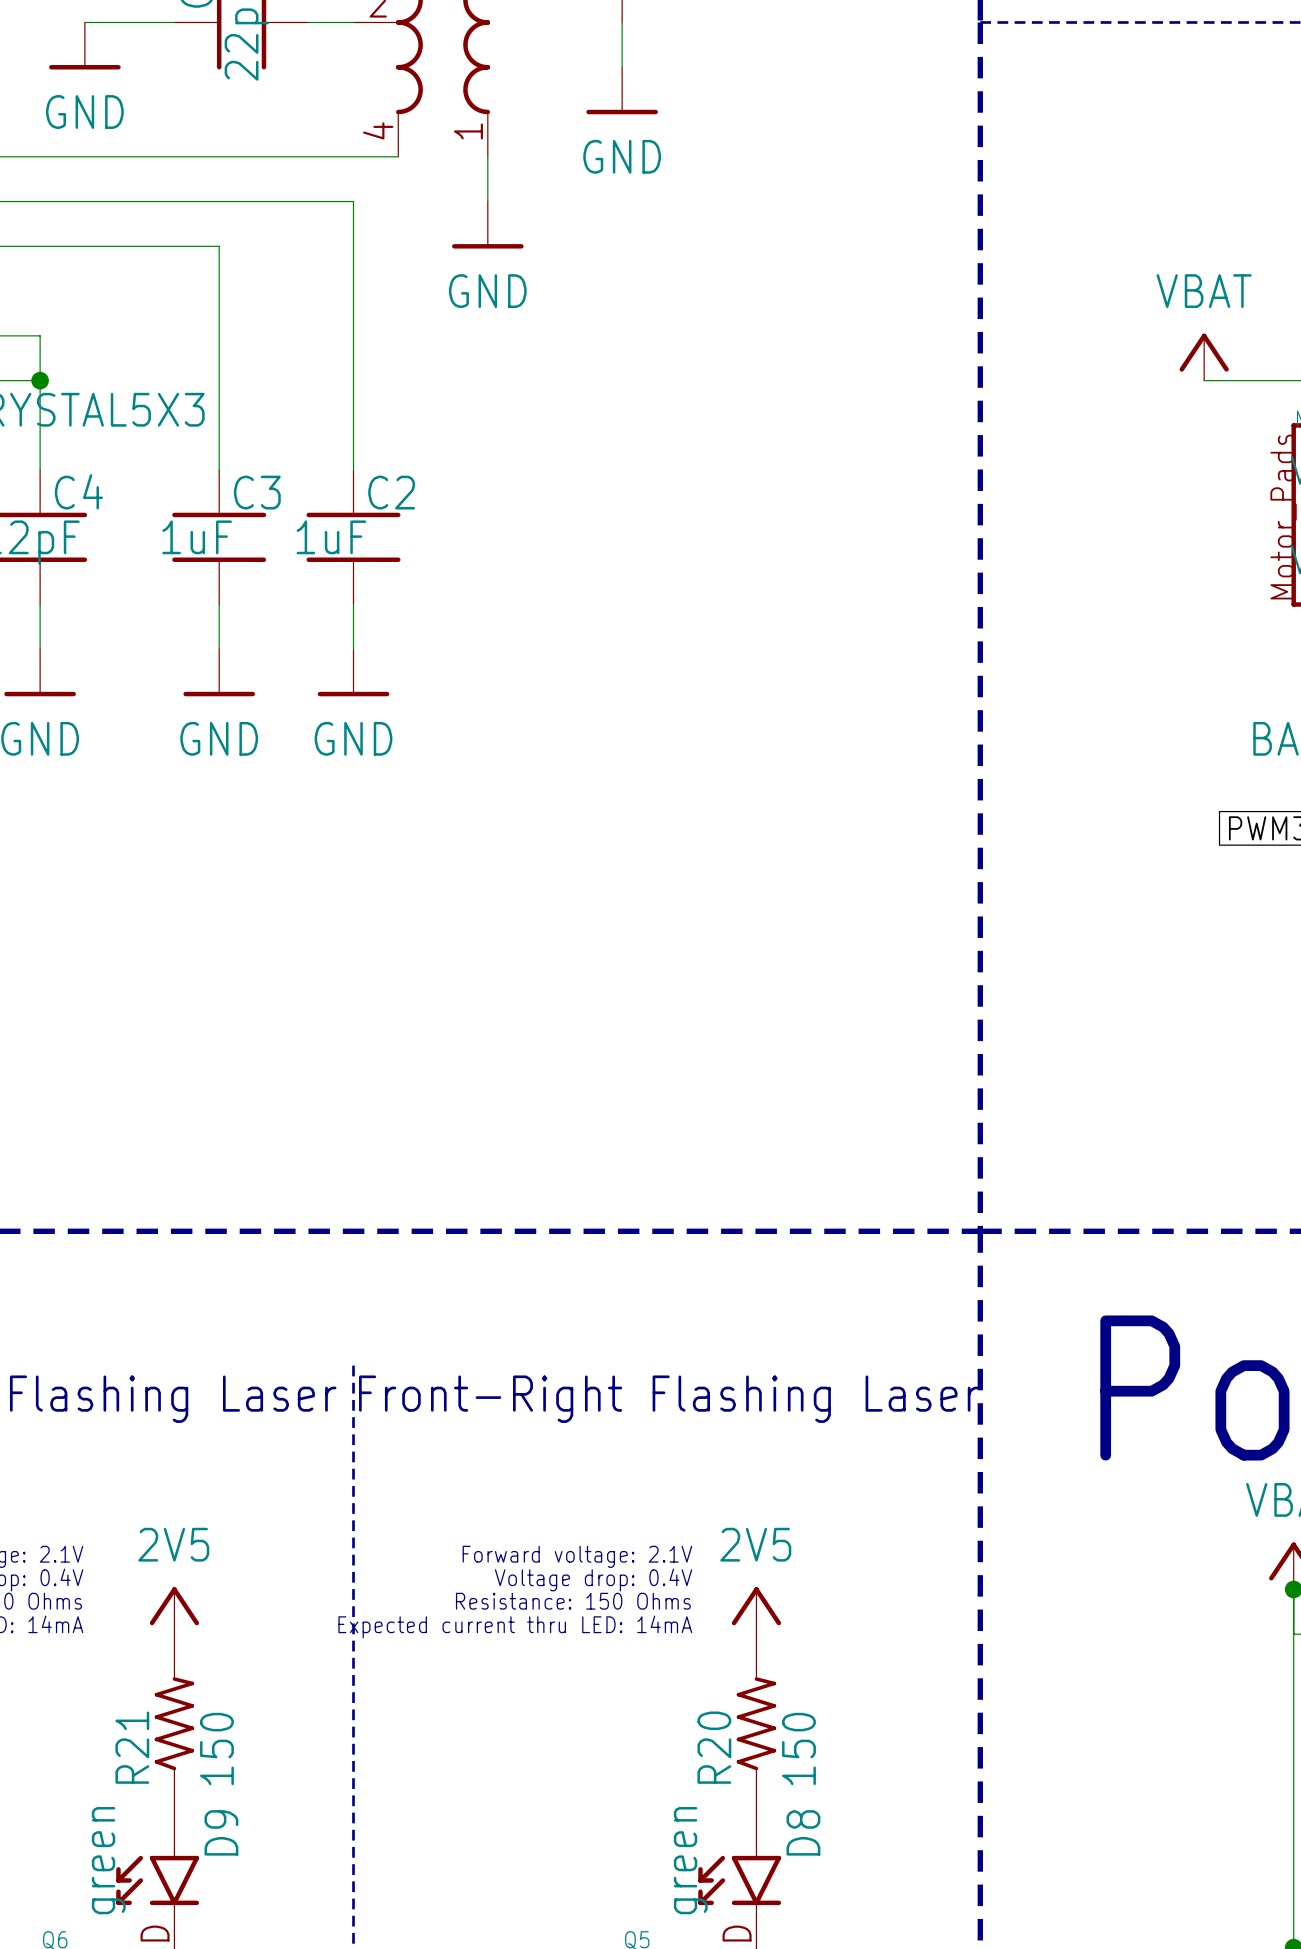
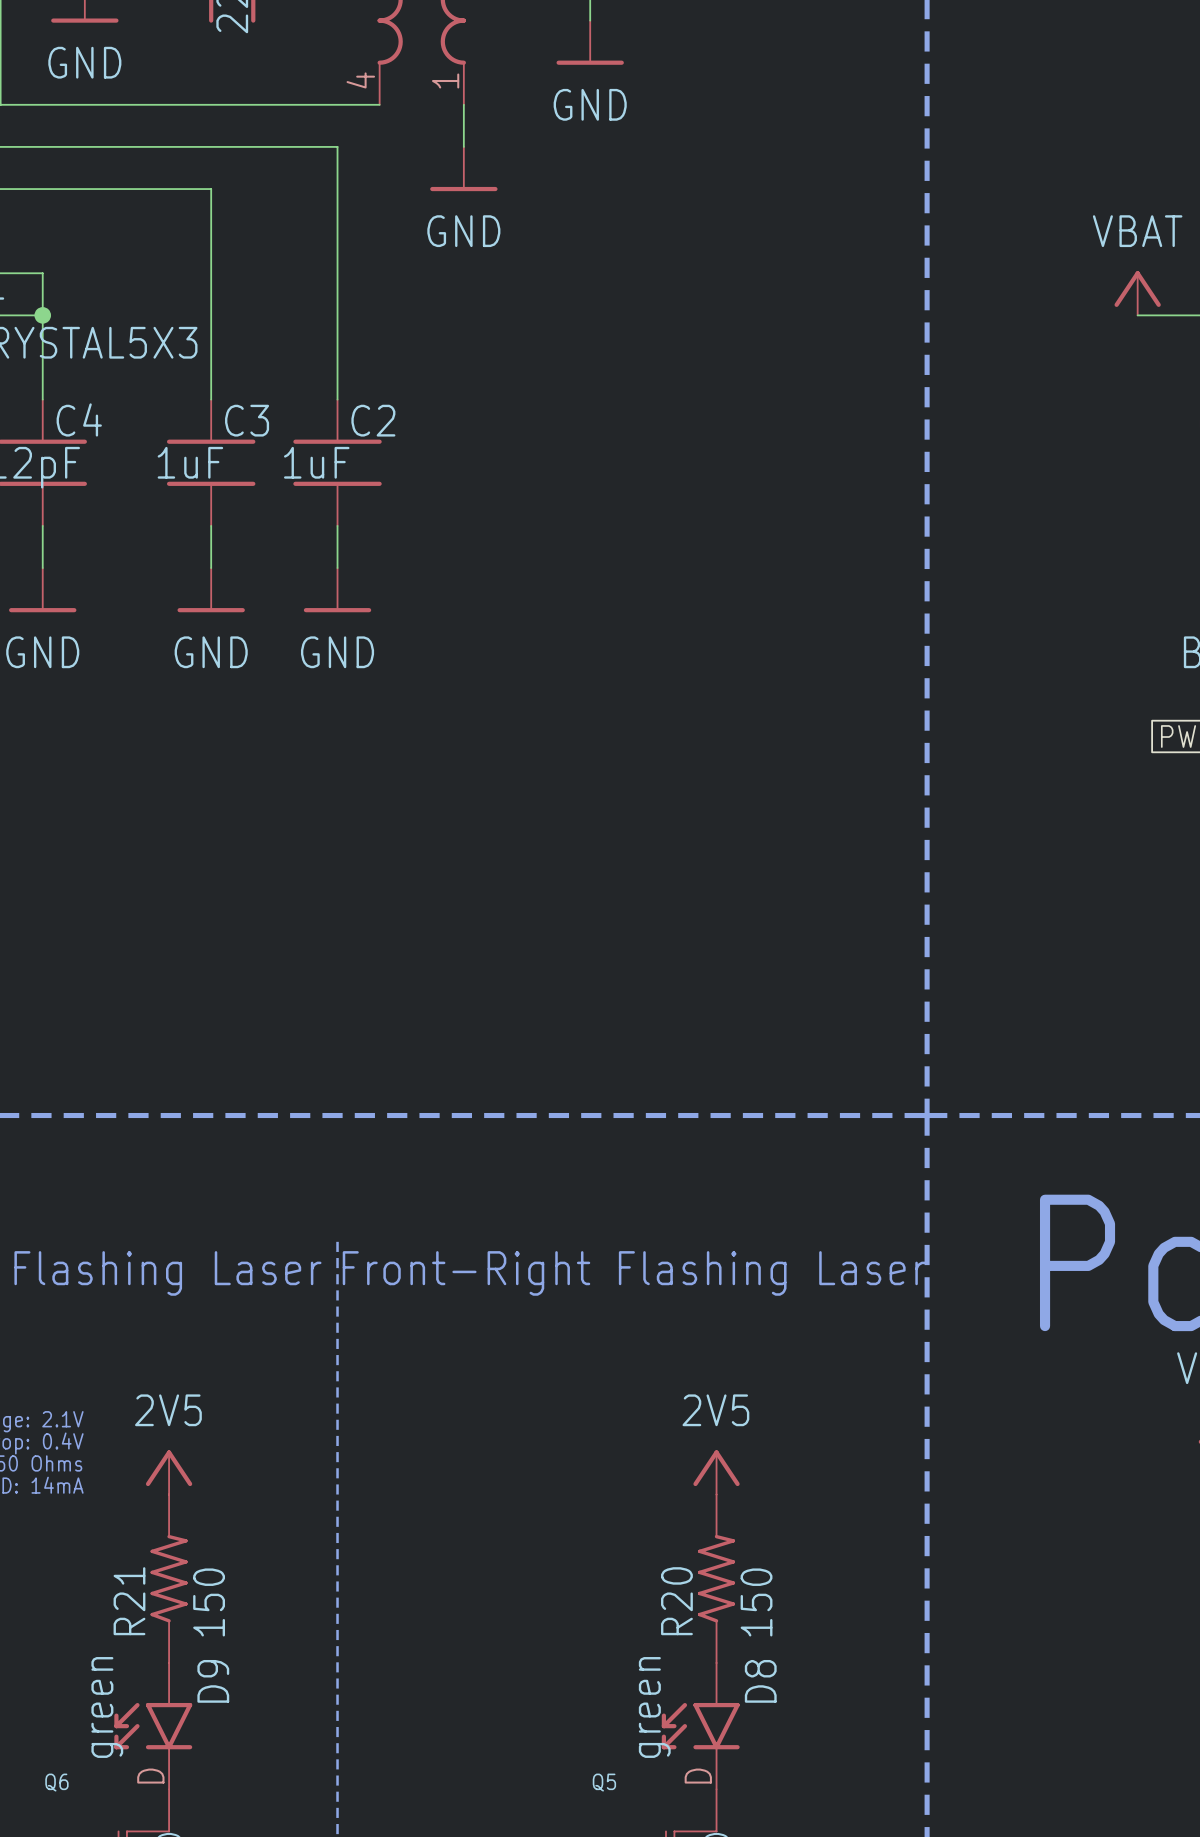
text: Forward voltage: 2.1V (577, 1556) -> none
text: Voltage drop: 0.4V (593, 1579) -> none
text: Resistance: 150 Ohms (573, 1601) -> none
text: Expected current thru LED: 14mA (515, 1626) -> none

